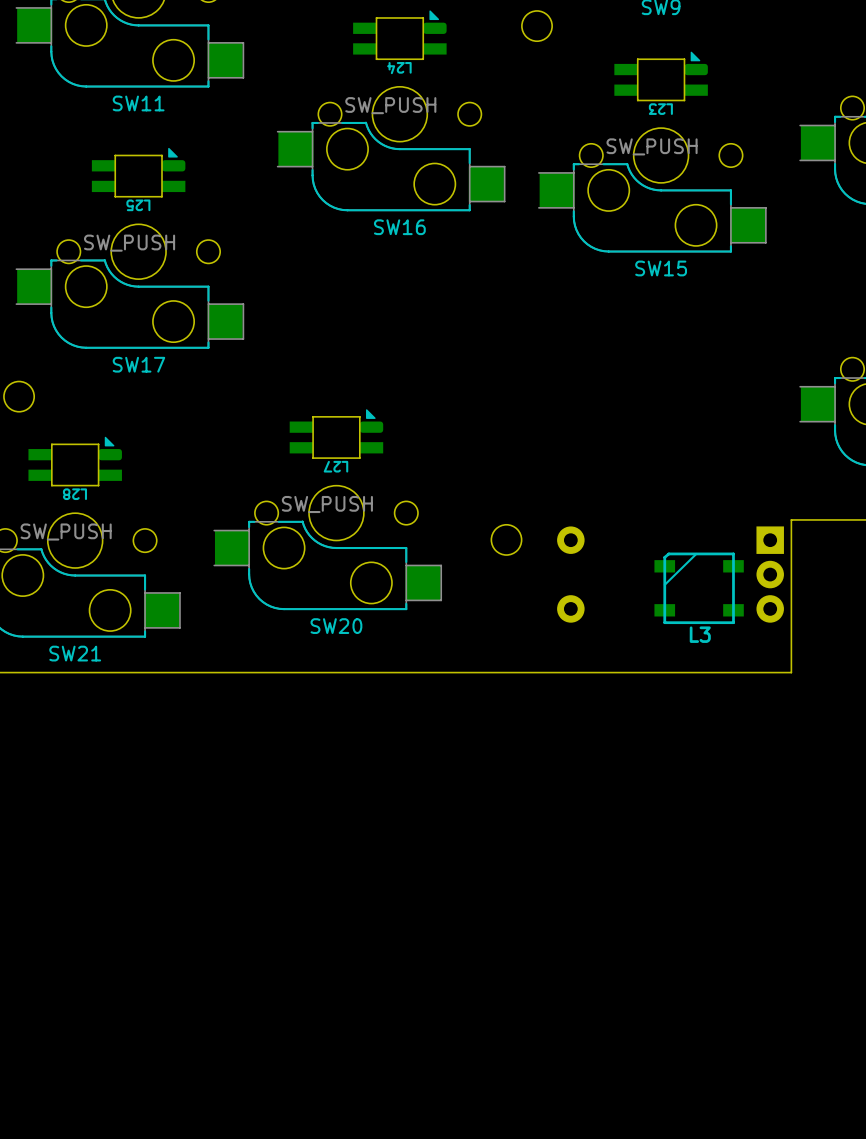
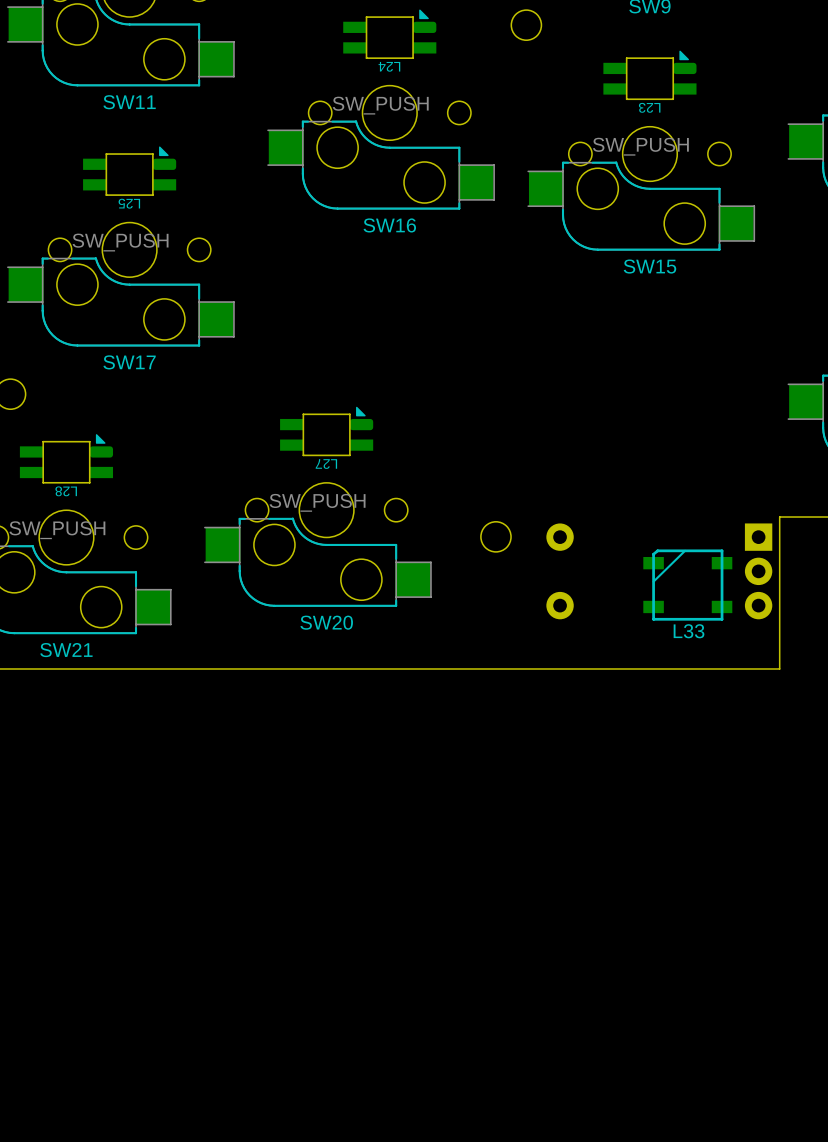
L3 name: L3 (700, 634) -> L33 (689, 631)

